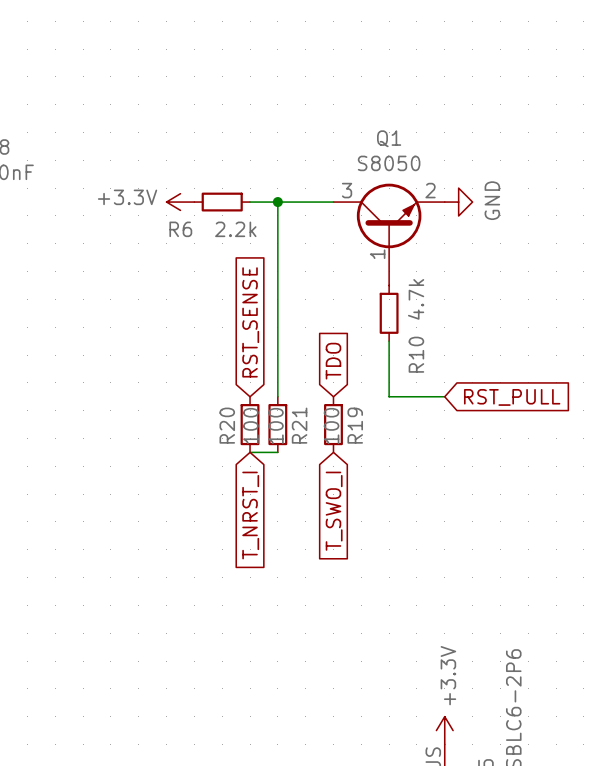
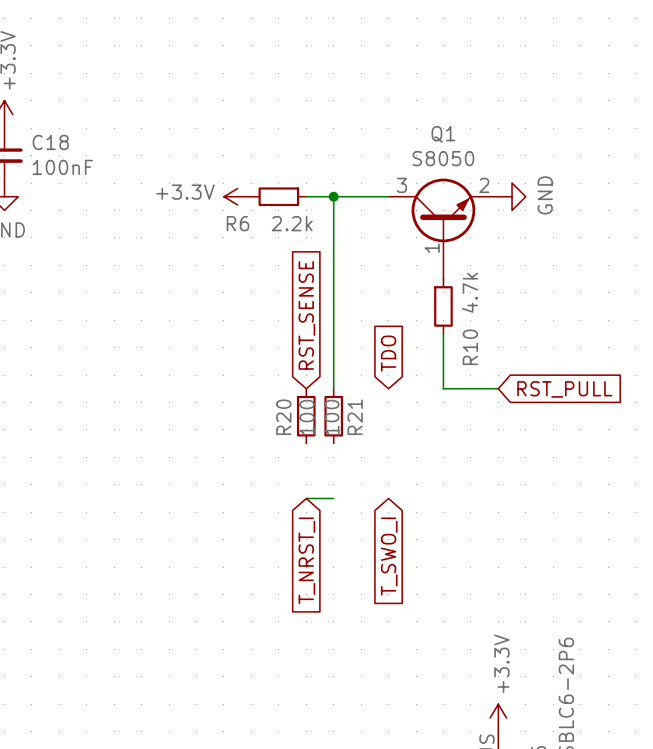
R19: 100 (333, 424) -> none
wire: (250, 452) (277, 452) -> (306, 498) (333, 498)
global label position: T_SWO_I (334, 511) -> T_SWO_I (389, 556)
global label position: T_NRST_I (250, 515) -> T_NRST_I (306, 560)

